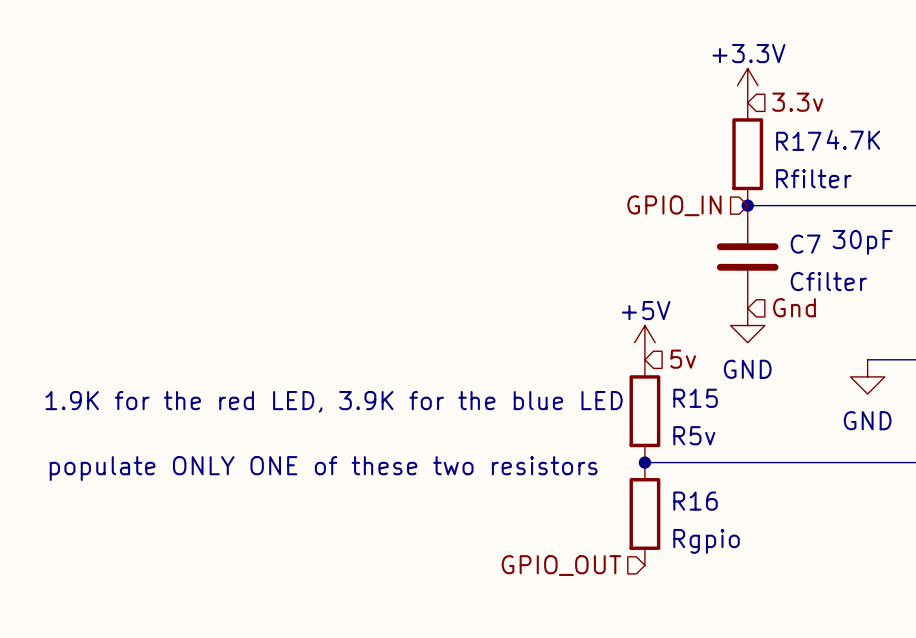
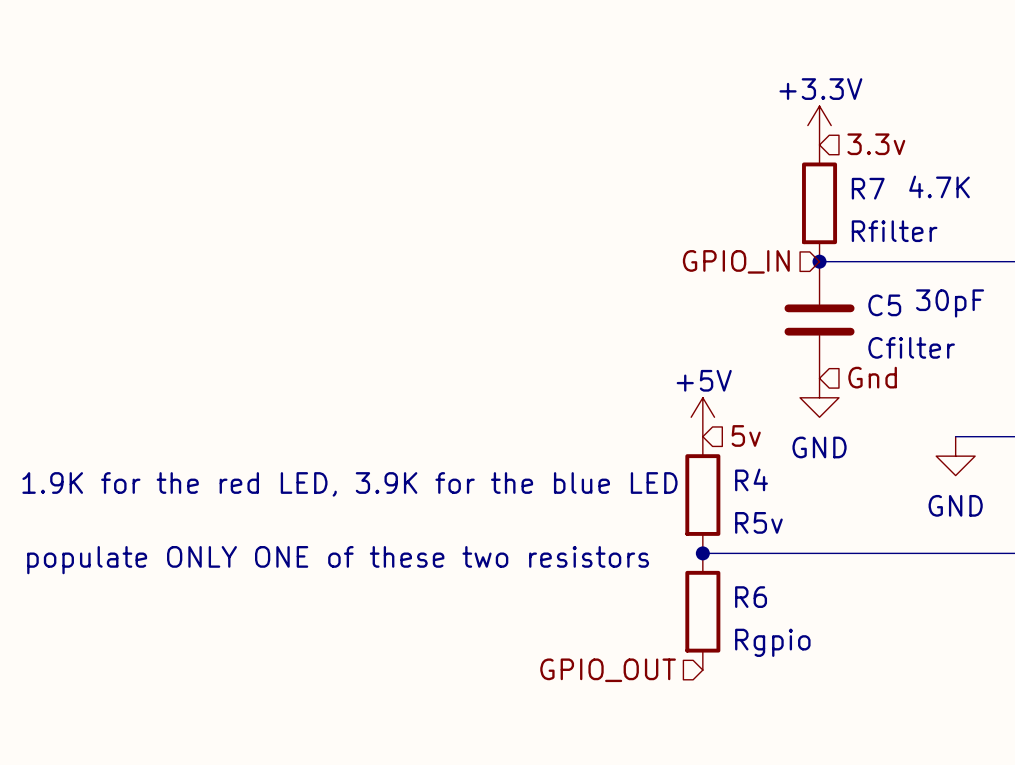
R17 name: R17 (798, 141) -> R7 (868, 188)
C7 name: C7 (805, 244) -> C5 (884, 305)
R15 name: R15 (695, 398) -> R4 (751, 479)
R16 name: R16 (695, 501) -> R6 (751, 597)

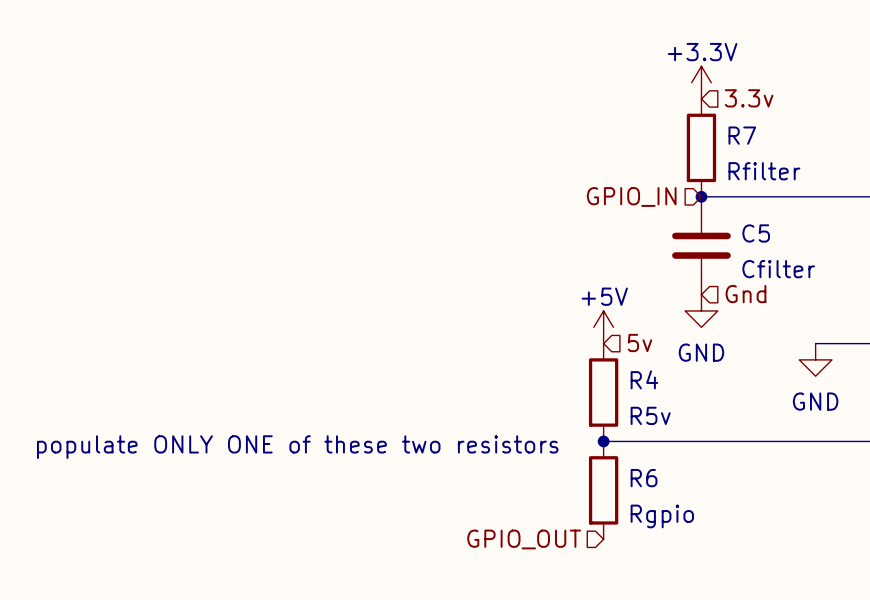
text: 4.7K (939, 186) -> none
text: 30pF (950, 303) -> none
text: 1.9K for the red LED, 3.9K for the blue LED (349, 484) -> none

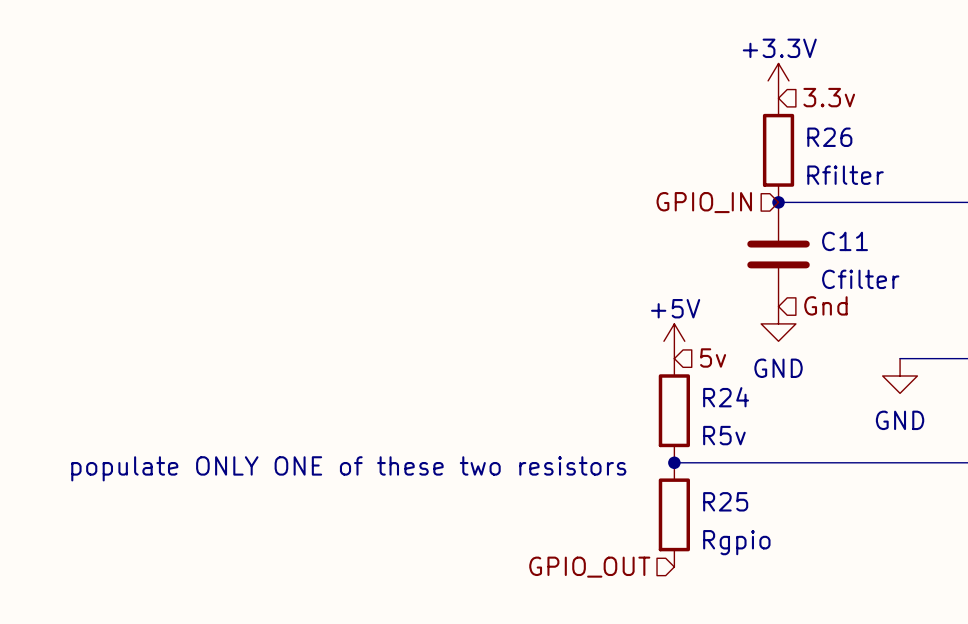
R7 name: R7 (742, 135) -> R26 (829, 137)
C5 name: C5 (756, 233) -> C11 (845, 241)
R4 name: R4 (644, 379) -> R24 (726, 397)
R6 name: R6 (644, 478) -> R25 (725, 501)

